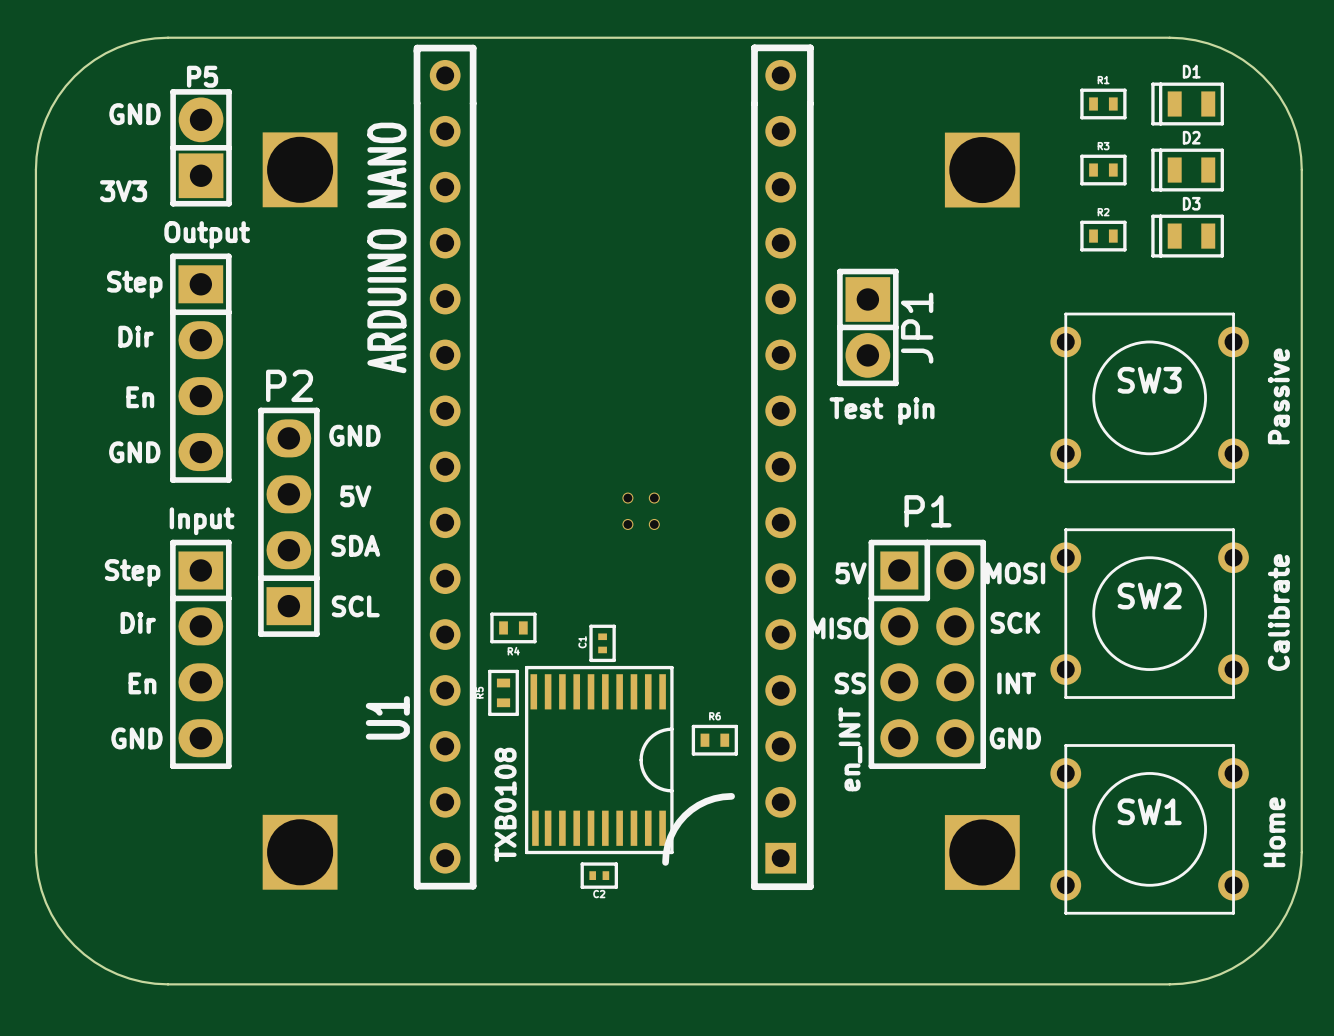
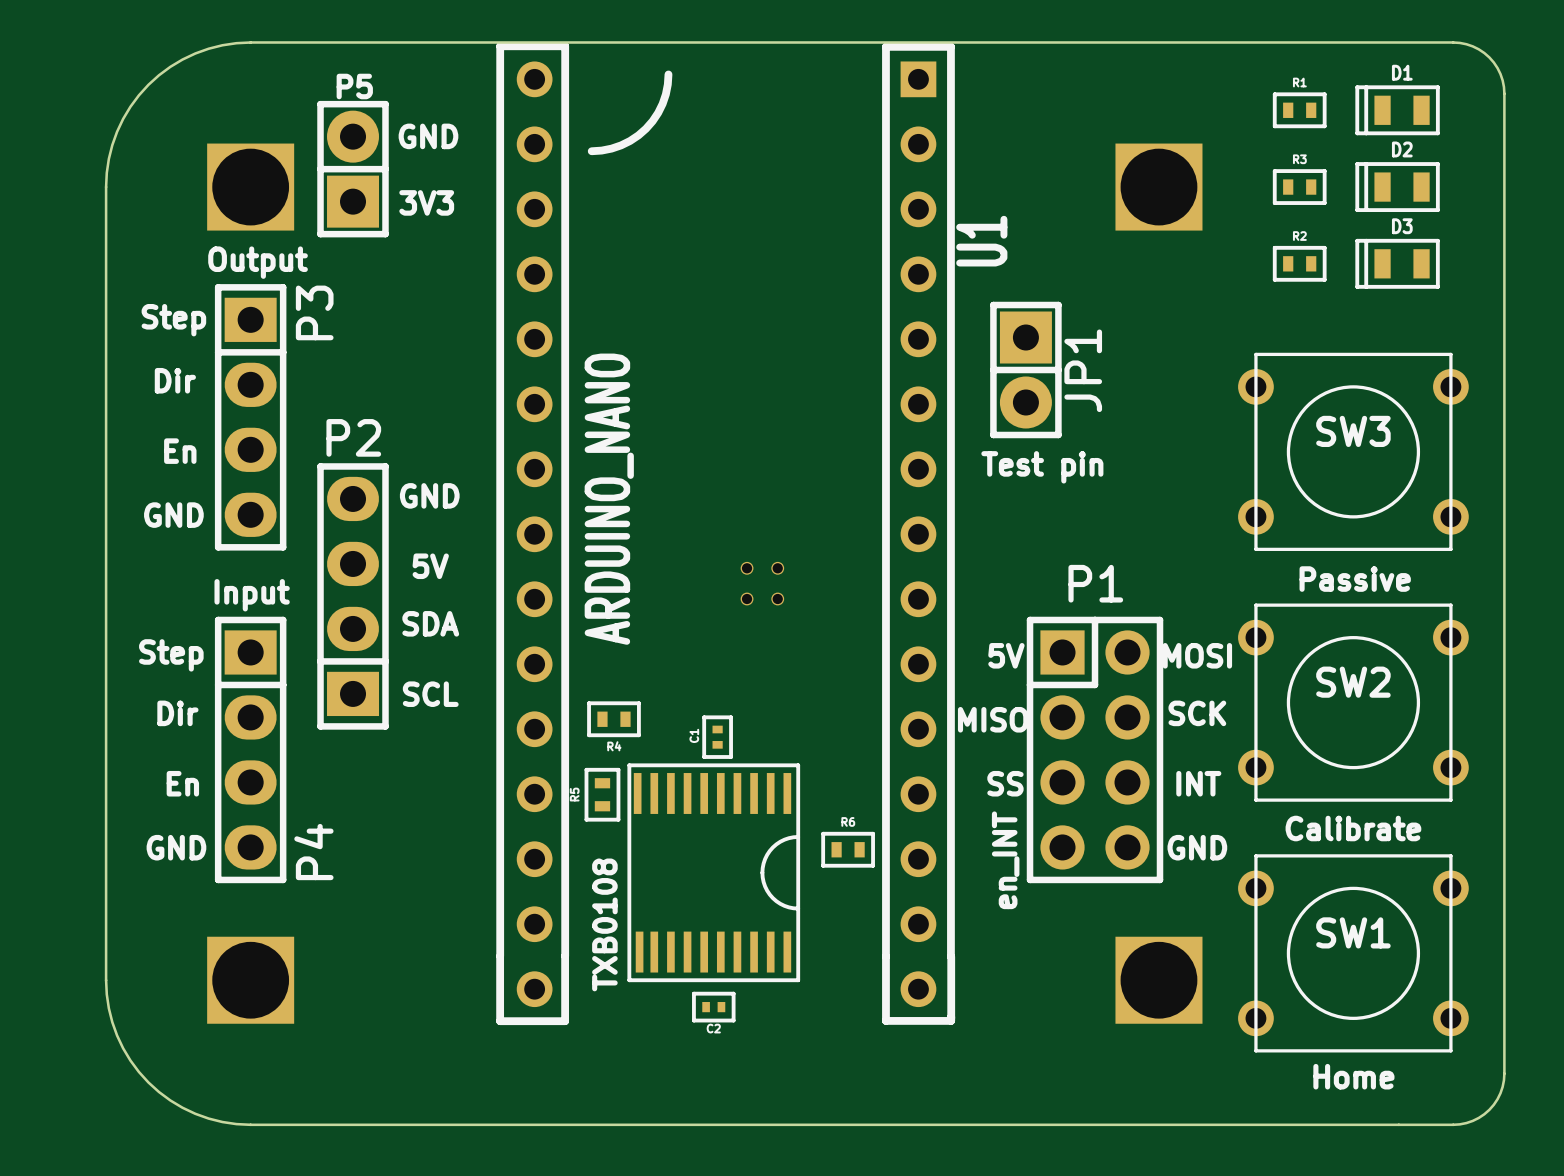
board edge: (168, 37) (1169, 37) (1195, 40) (1220, 47) (1253, 67) (1271, 86) (1291, 119) (1299, 144) (1301, 169) (1301, 852) (1299, 878) (1291, 902) (1271, 936) (1253, 954) (1220, 974) (1195, 981) (1169, 984) (168, 984) (142, 981) (117, 974) (84, 954) (65, 936) (51, 914) (41, 890) (36, 865) (36, 156) (41, 131) (51, 107) (65, 86) (84, 67) (117, 47) (142, 40) (168, 37) -> (250, 42) (208, 48) (182, 59) (158, 75) (138, 95) (123, 118) (112, 145) (106, 172) (106, 994) (112, 1022) (123, 1048) (138, 1071) (158, 1091) (182, 1107) (208, 1118) (250, 1124) (1453, 1124) (1466, 1123) (1478, 1117) (1493, 1104) (1500, 1093) (1504, 1073) (1504, 93) (1500, 74) (1493, 62) (1484, 53) (1466, 44) (1453, 42) (250, 42)
U1 footprint: [413, 44, 814, 891] -> [496, 42, 956, 1026]
text position: GND (134, 114) -> GND (428, 136)
P5 position: (201, 147) -> (353, 169)
part position: (300, 169) -> (250, 187)
text position: 3V3 (123, 191) -> 3V3 (426, 202)
U1 value: ARDUINO NANO (386, 247) -> ARDUINO_NANO (609, 499)
P3 name: none -> P3 (314, 312)
text rotation: 0° (1278, 396) -> 90° clockwise (1355, 579)
text position: Passive (1278, 396) -> Passive (1355, 579)
text rotation: 0° (1278, 612) -> 90° clockwise (1353, 828)
text position: Calibrate (1278, 612) -> Calibrate (1353, 828)
U1 name position: U1 (387, 717) -> U1 (981, 241)
P4 name: none -> P4 (313, 852)
text rotation: 0° (1274, 832) -> 90° clockwise (1353, 1076)
text position: Home (1274, 832) -> Home (1353, 1076)
part position: (300, 852) -> (250, 980)

